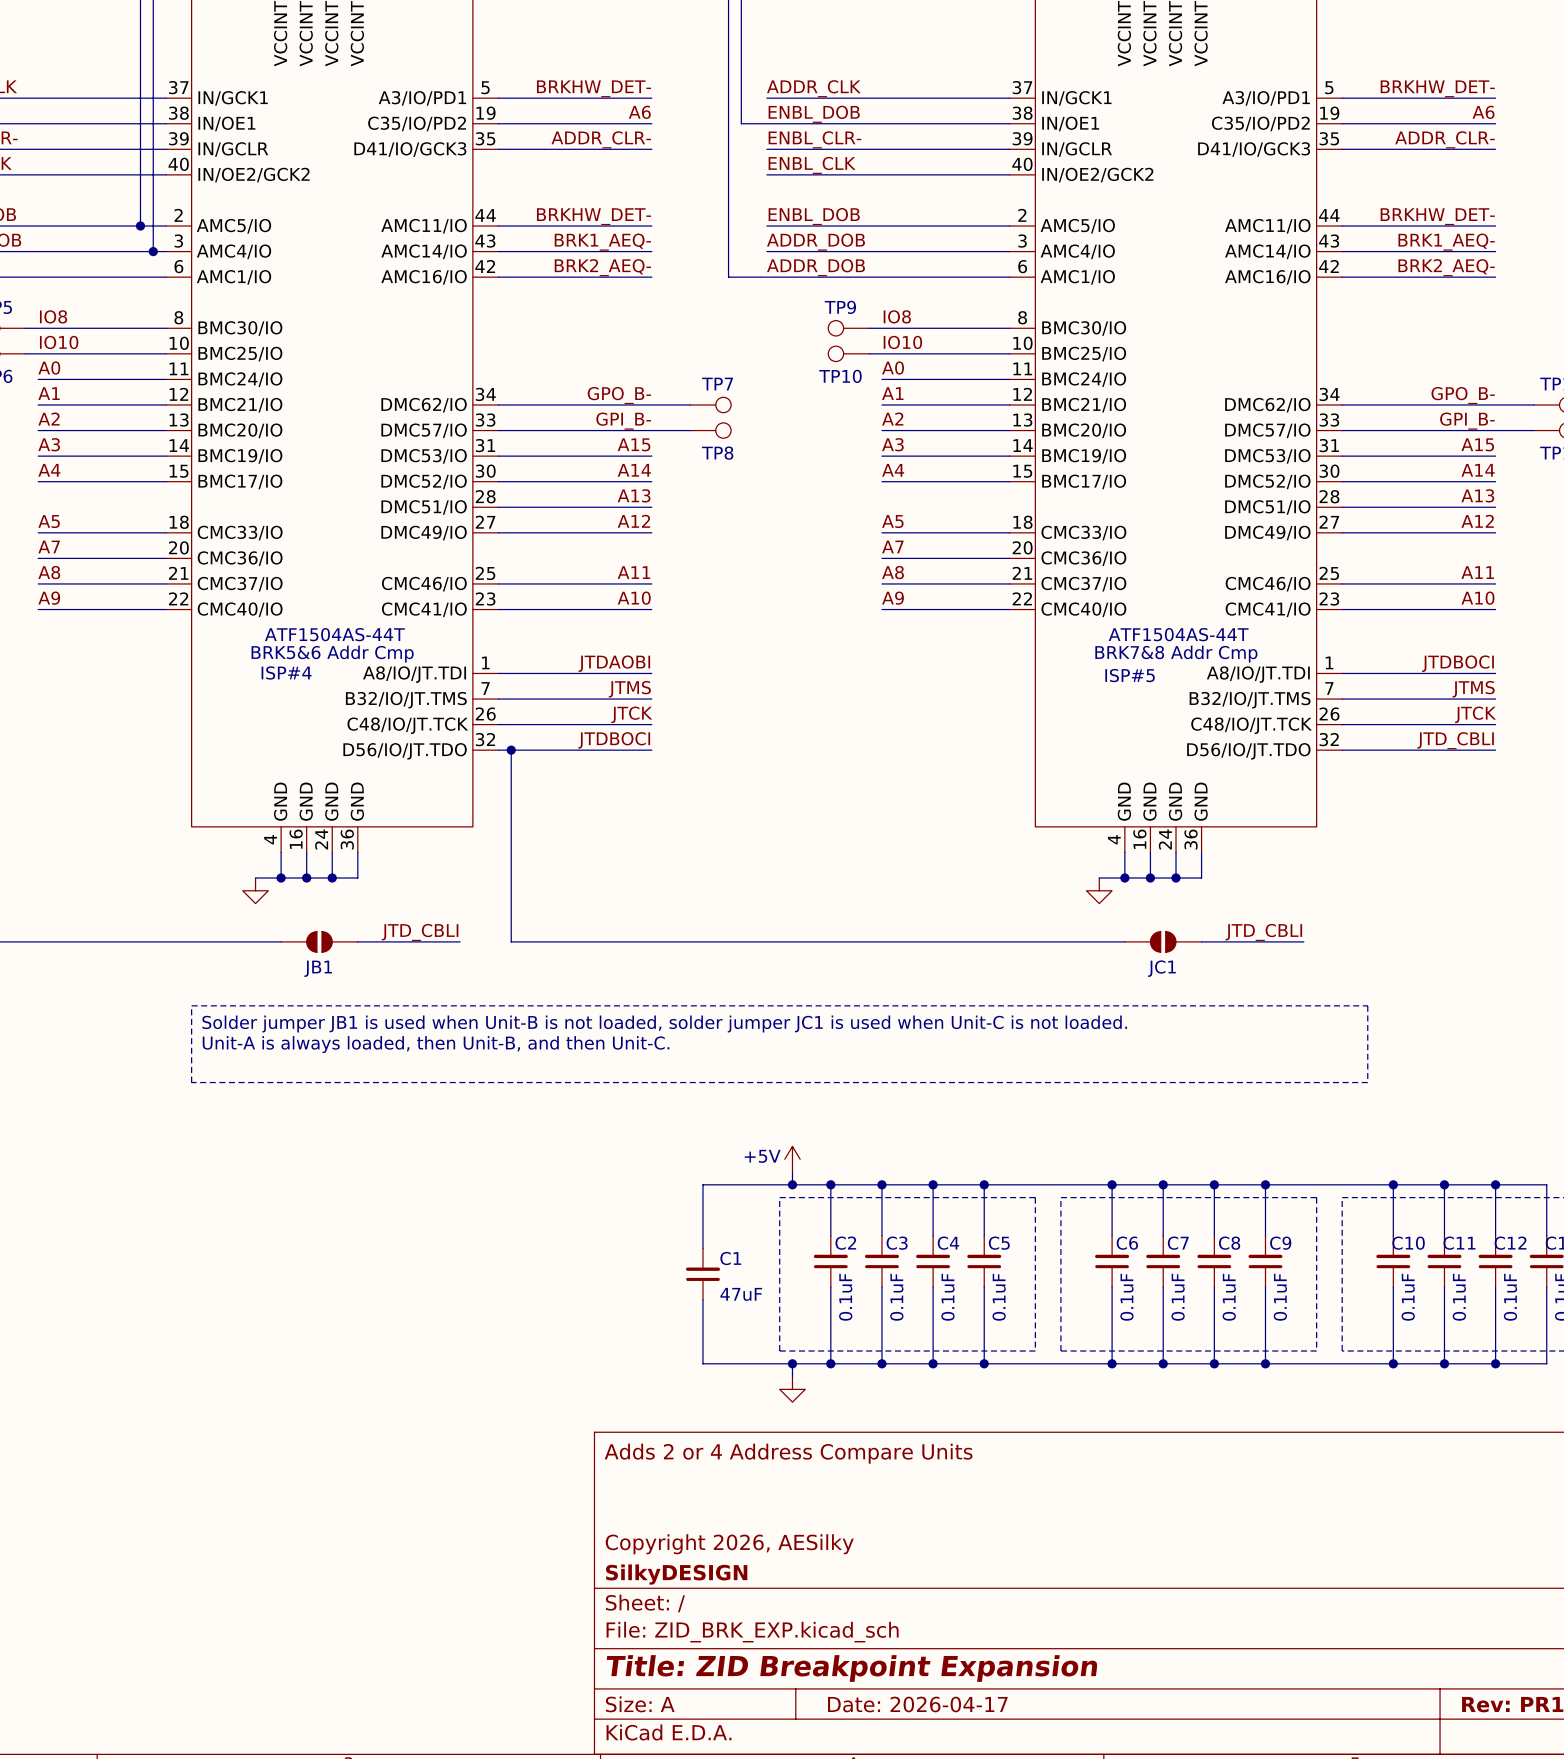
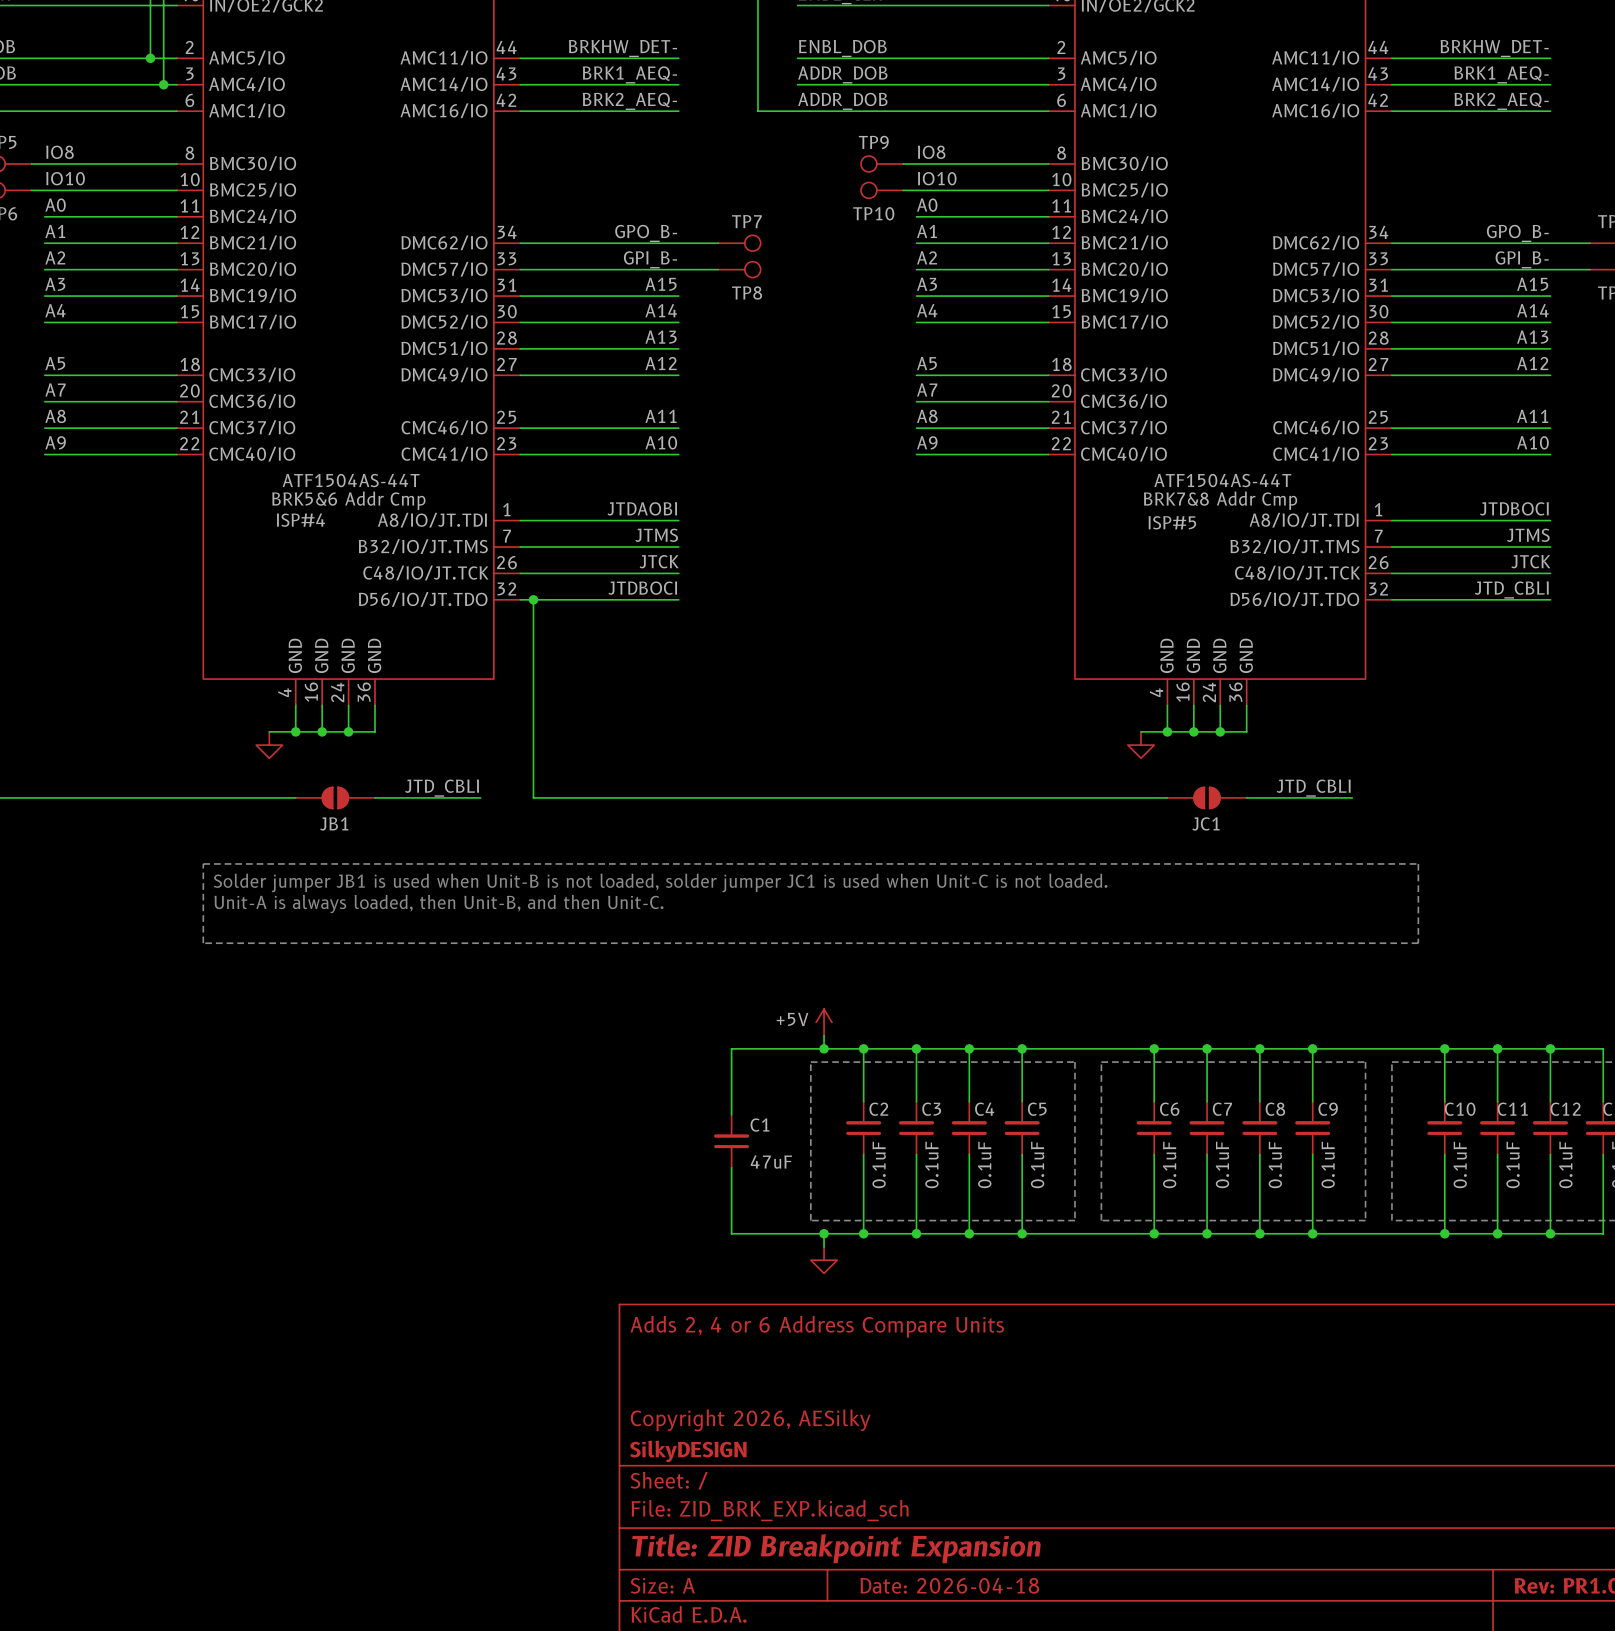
title block: Adds 2 or 4 Address Compare Units (788, 1453) -> Adds 2, 4 or 6 Address Compare Units (817, 1326)
title block: Date: 2026-04-17 (917, 1704) -> Date: 2026-04-18 (949, 1585)

